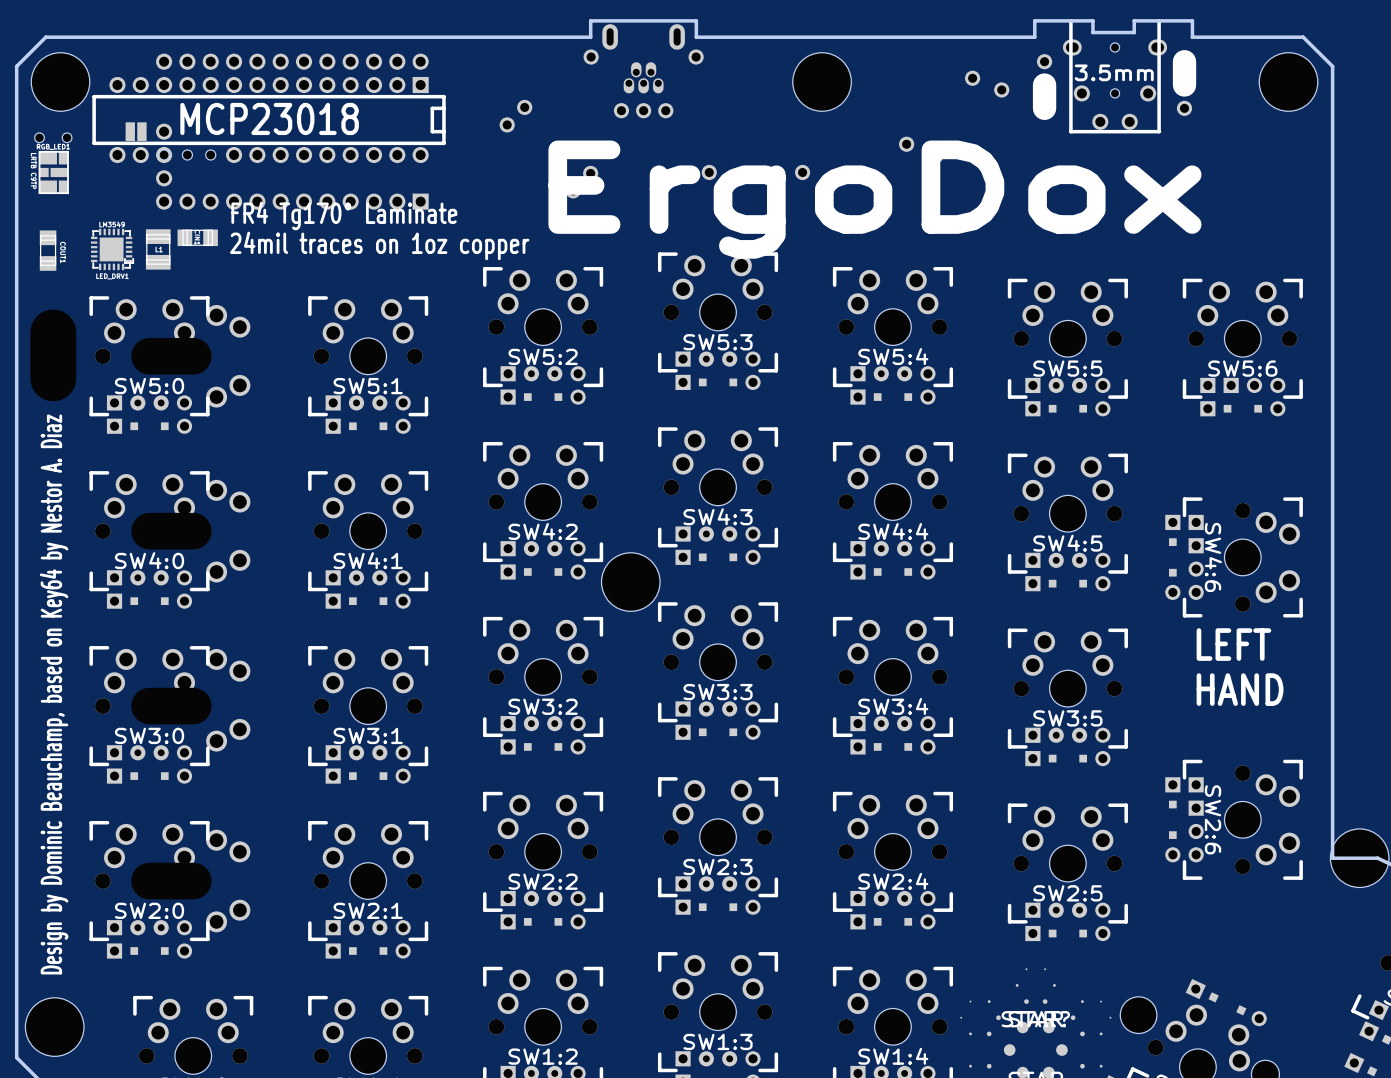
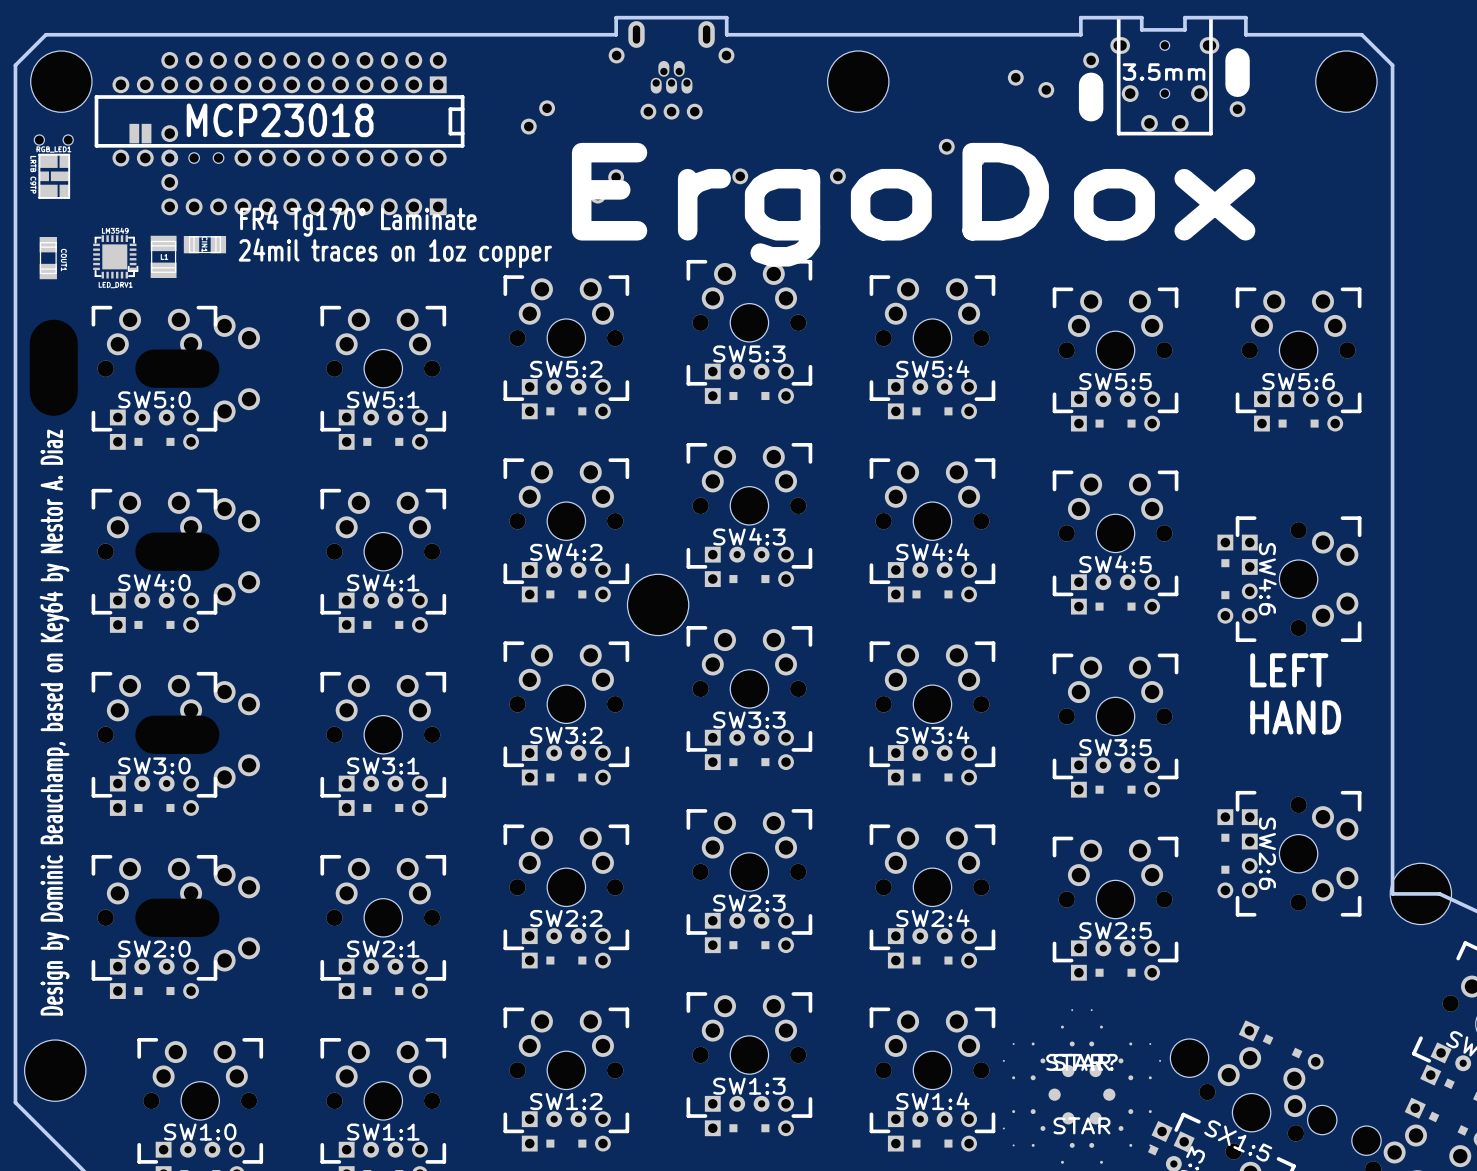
part footprint: [89, 646, 251, 784] -> [91, 671, 261, 816]

